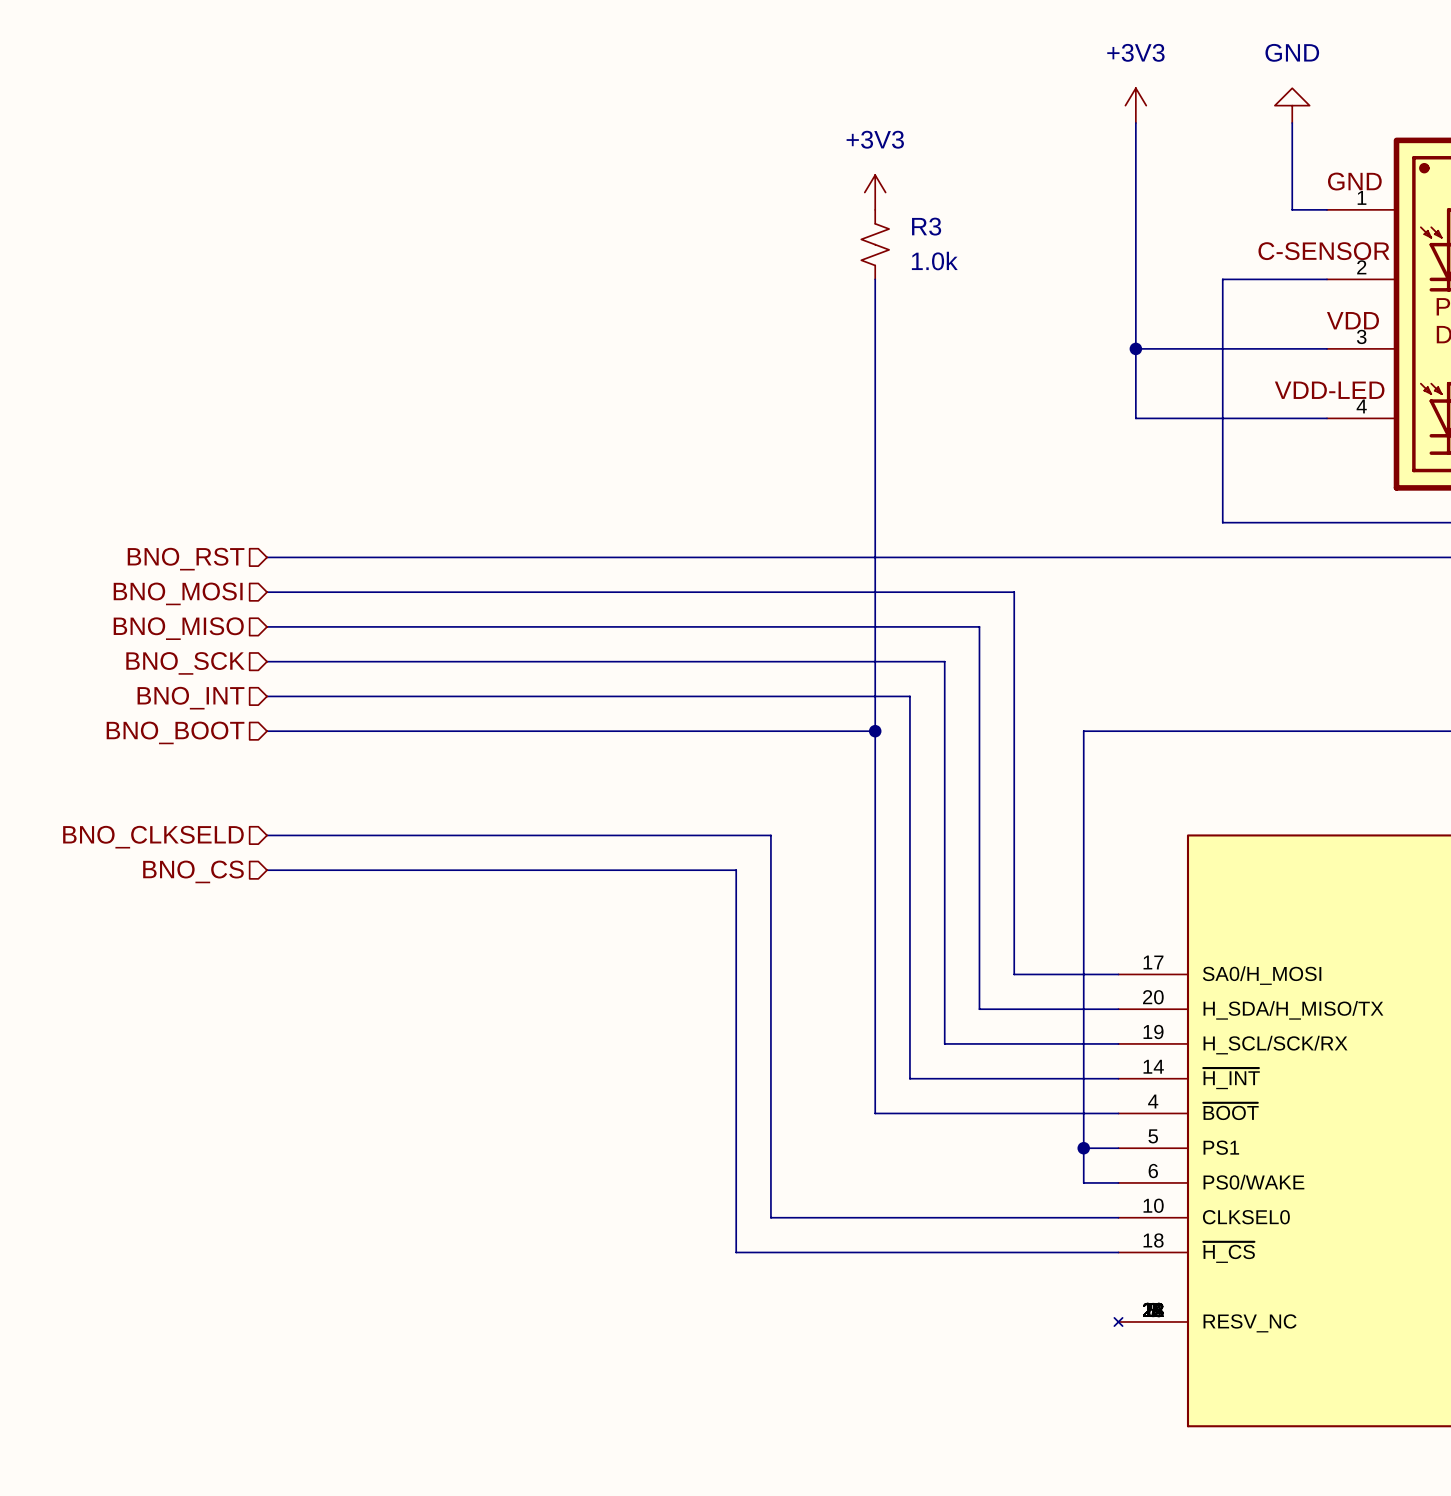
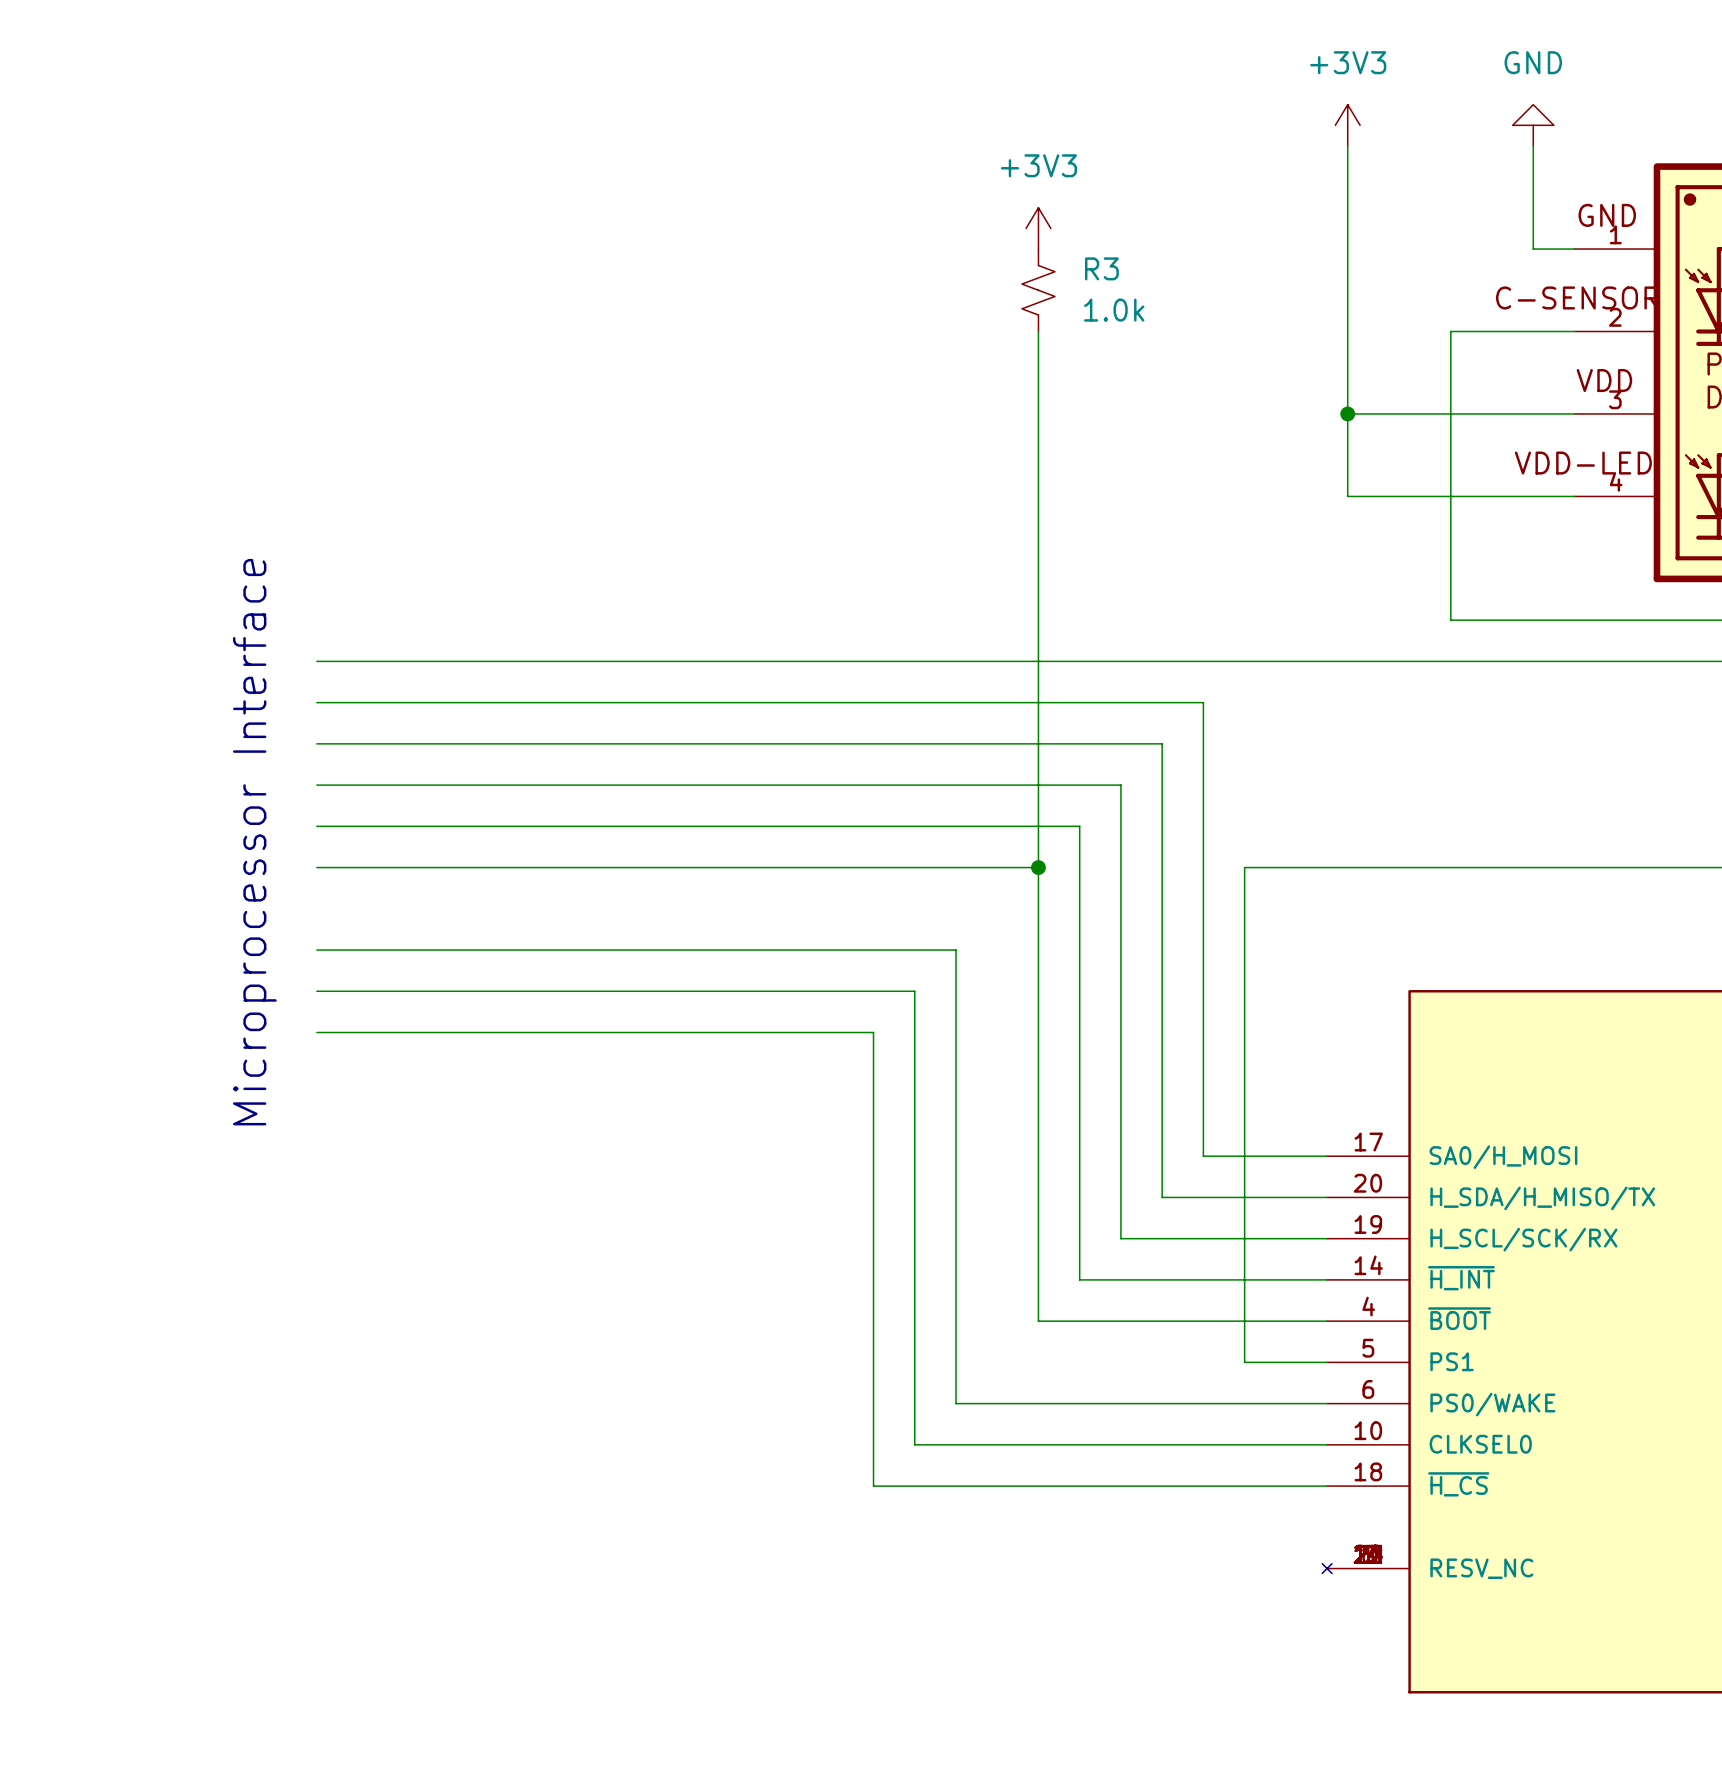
hierarchical label: BNO_RST (186, 559) -> none
hierarchical label: BNO_MOSI (178, 593) -> none
hierarchical label: BNO_MISO (178, 628) -> none
hierarchical label: BNO_SCK (185, 663) -> none
hierarchical label: BNO_INT (190, 698) -> none
text: none -> Microprocessor Interface (254, 842)
wire: (1083, 731) (1083, 1182) -> (1285, 867) (1244, 867) (1244, 1362) (1285, 1362)
hierarchical label: BNO_BOOT (175, 732) -> none
wire: none -> (316, 950) (955, 950) (955, 1403) (1285, 1403)
hierarchical label: BNO_CLKSELD (153, 837) -> none
hierarchical label: BNO_CS (193, 871) -> none
junction: (1083, 1148) -> none

